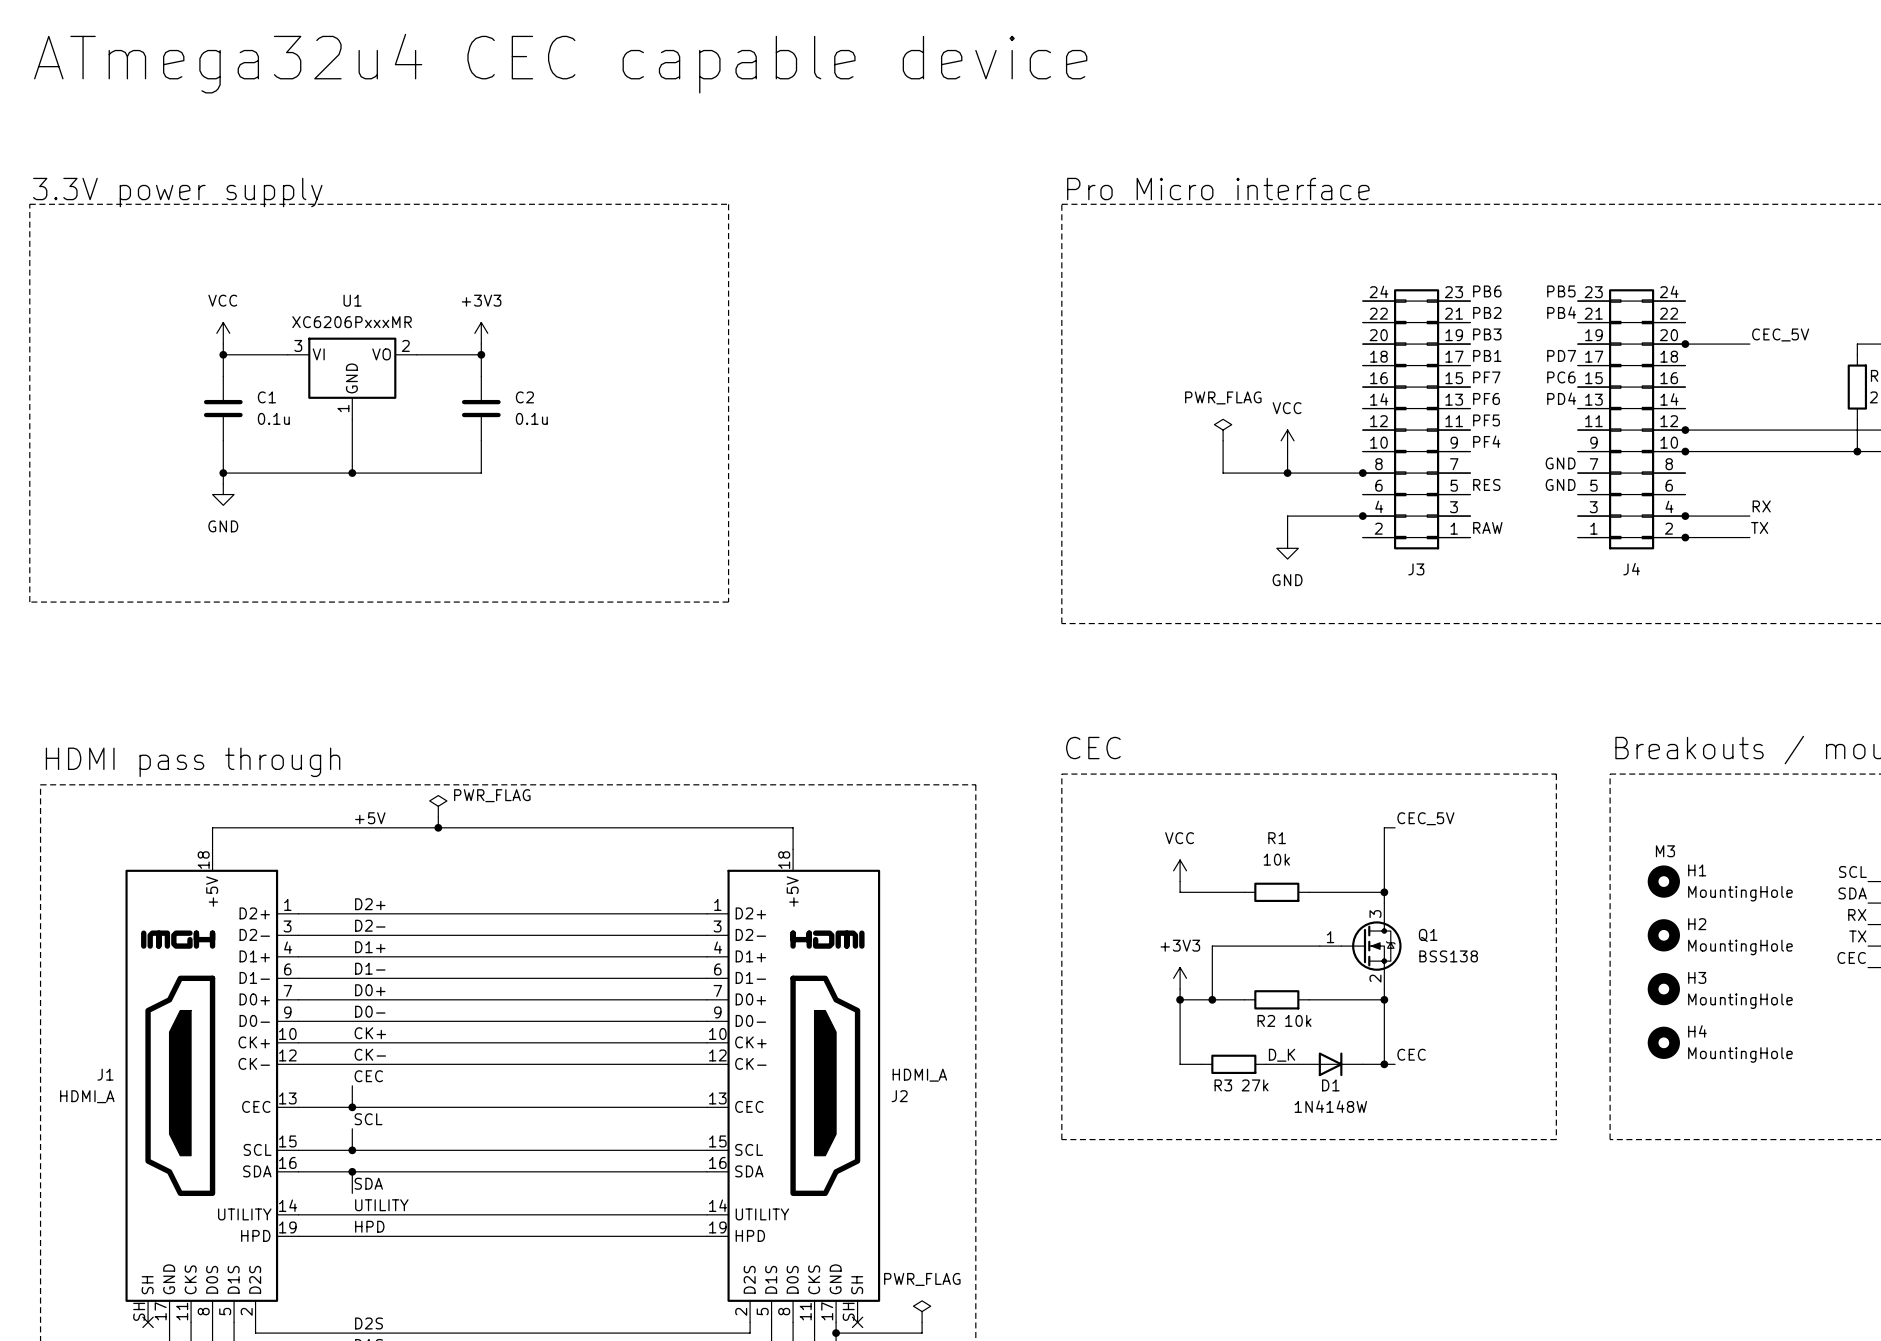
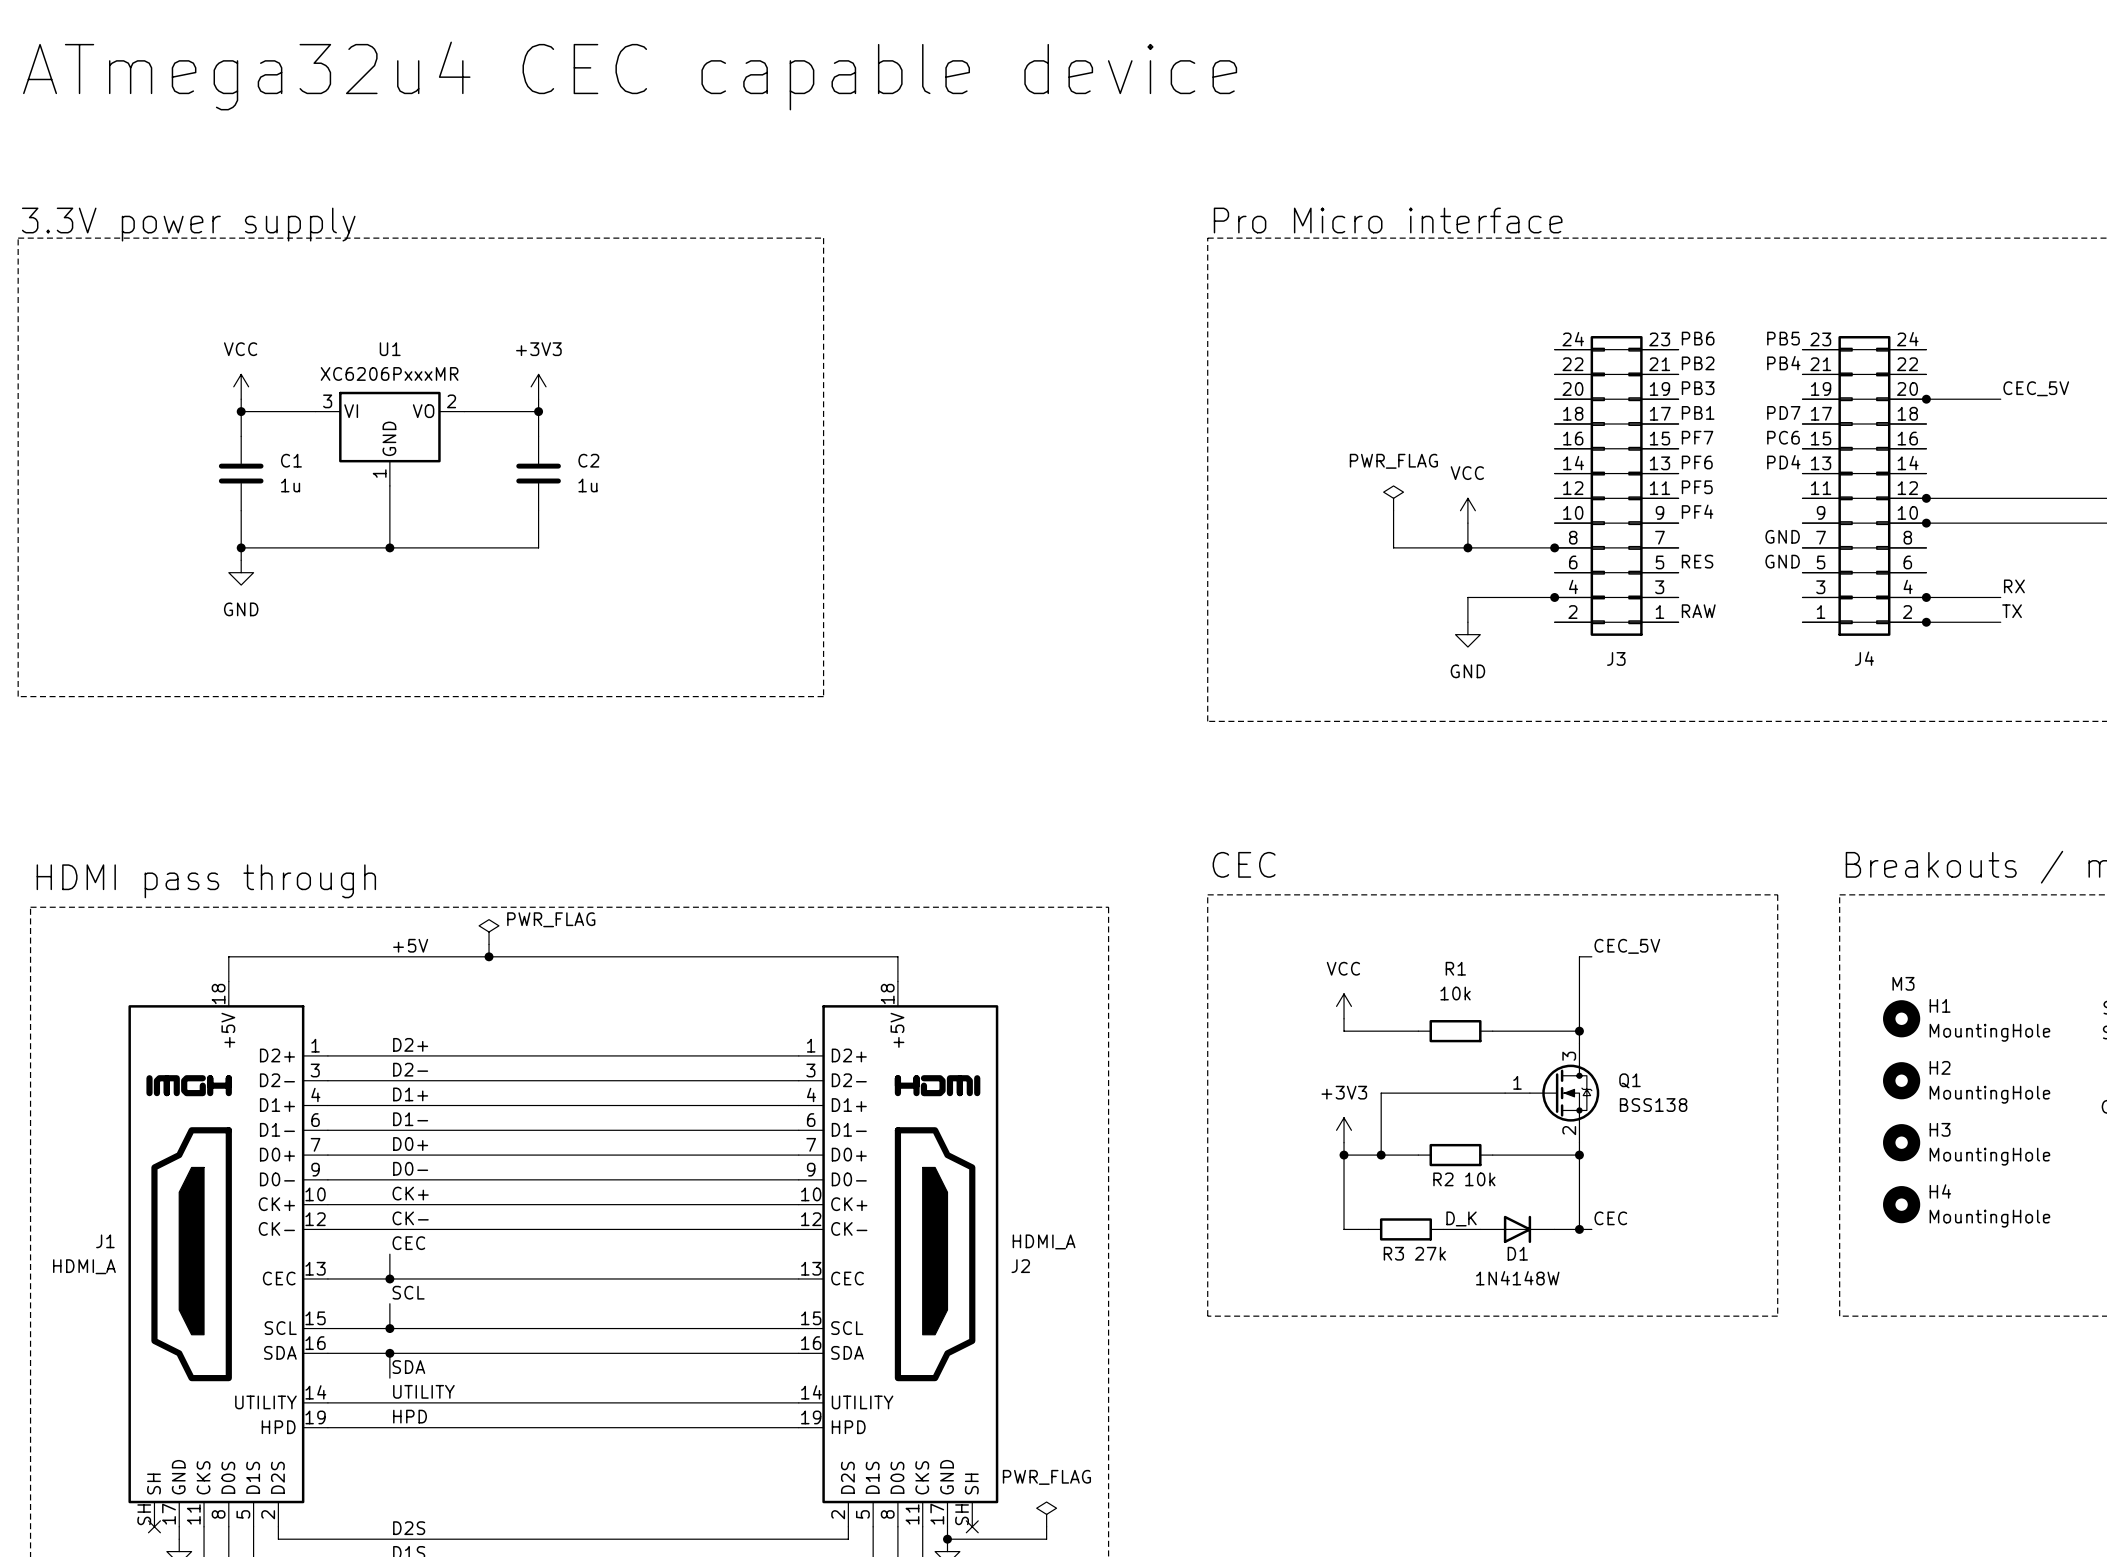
C1 value: 0.1u (273, 418) -> 1u (290, 485)
C2 value: 0.1u (531, 418) -> 1u (587, 485)

